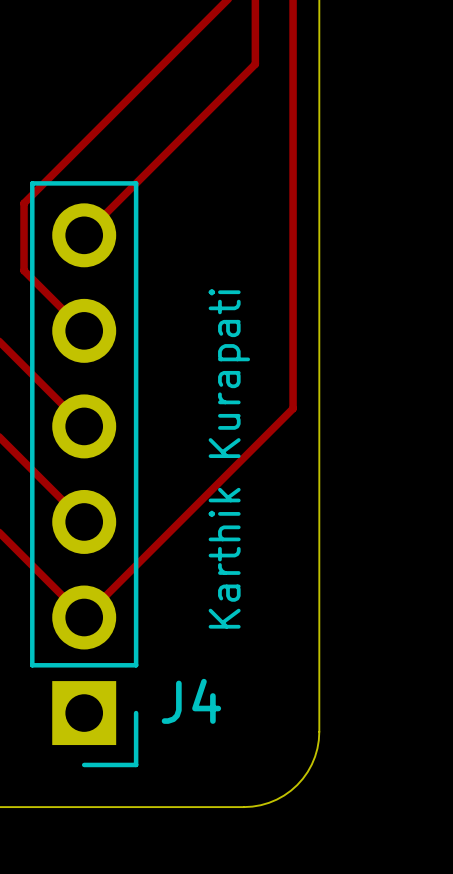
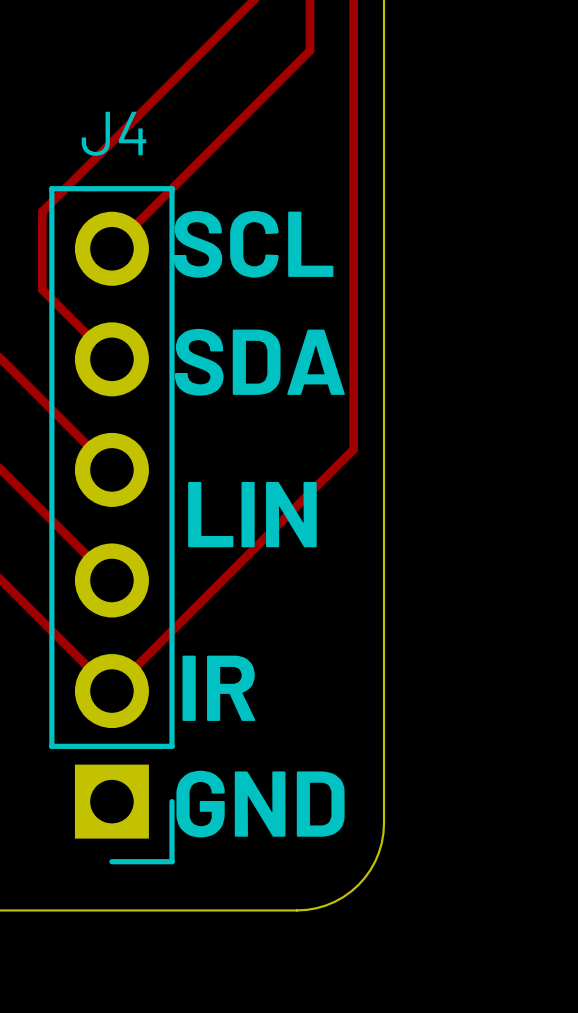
text: none -> SCL (253, 244)
text: none -> SDA (259, 362)
text: Karthik Kurapati (229, 458) -> none
text: none -> LIN (252, 514)
text: none -> IR (218, 688)
J4 name position: J4 (191, 701) -> J4 (113, 133)
text: none -> GND (260, 804)

